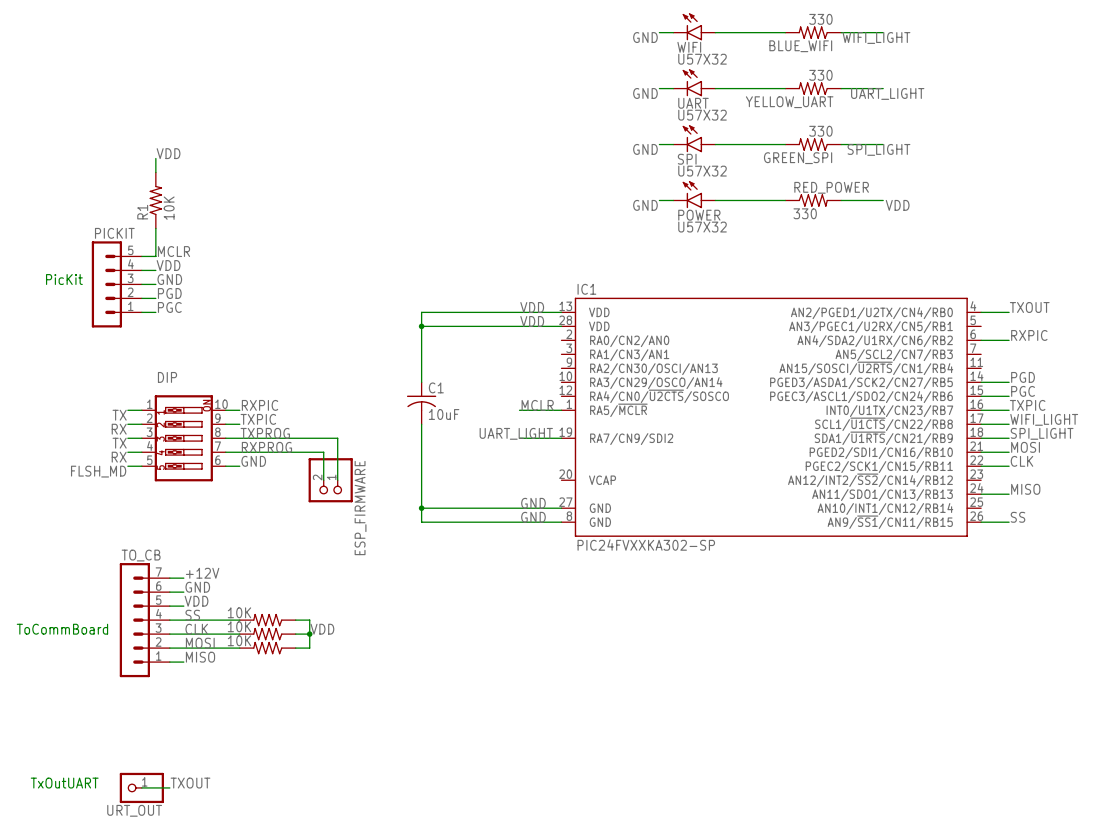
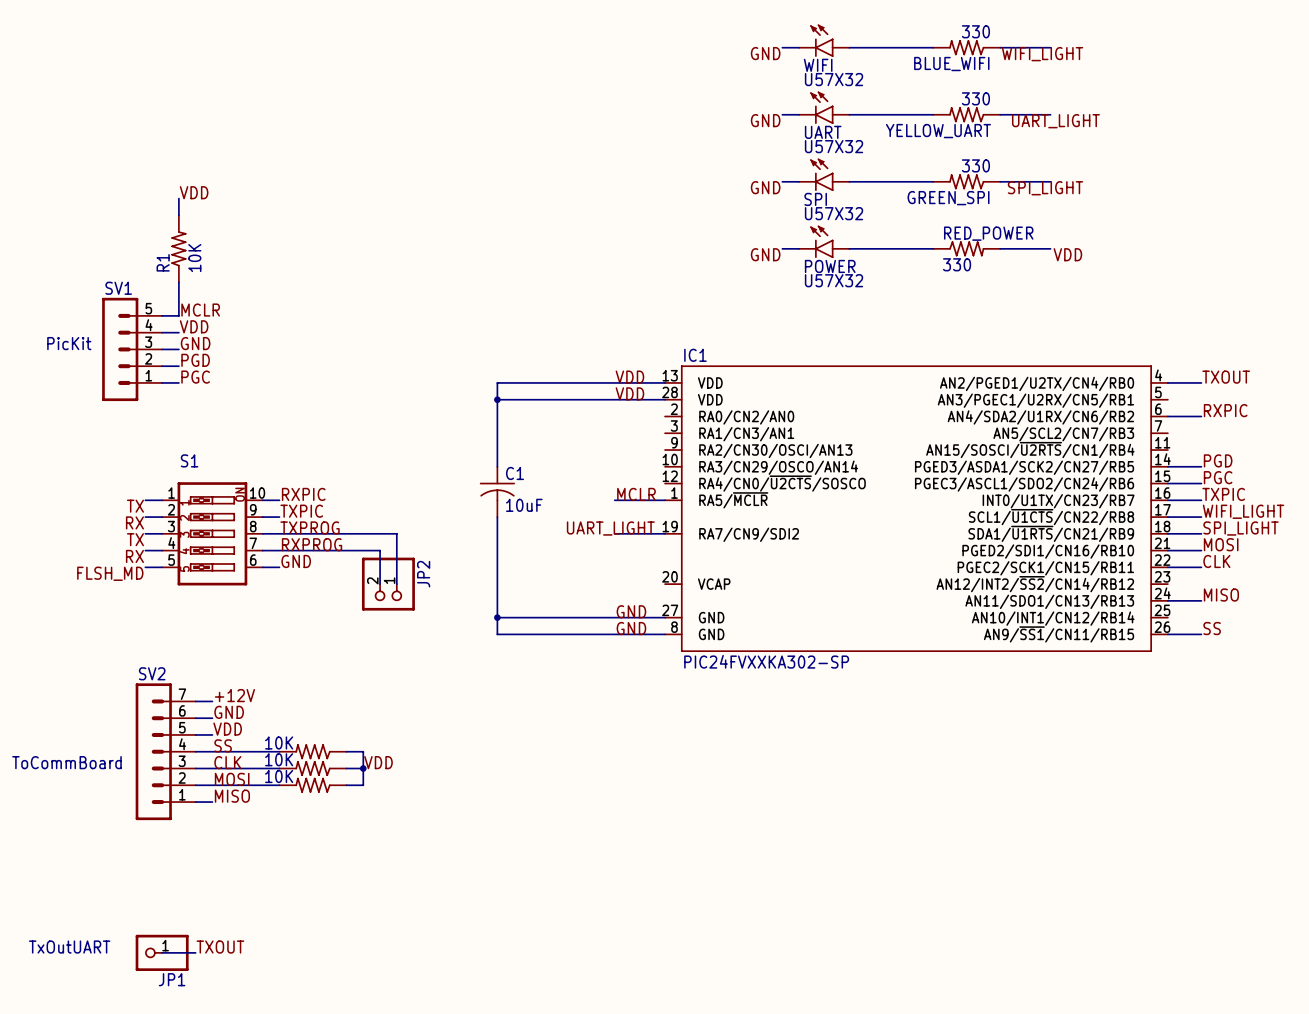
PICKIT name: PICKIT (114, 233) -> SV1 (118, 288)
DIP name: DIP (167, 377) -> S1 (189, 460)
ESP_FIRMWARE name: ESP_FIRMWARE (360, 508) -> JP2 (423, 574)
TO_CB name: TO_CB (141, 555) -> SV2 (152, 673)
URT_OUT name: URT_OUT (134, 810) -> JP1 (172, 979)

